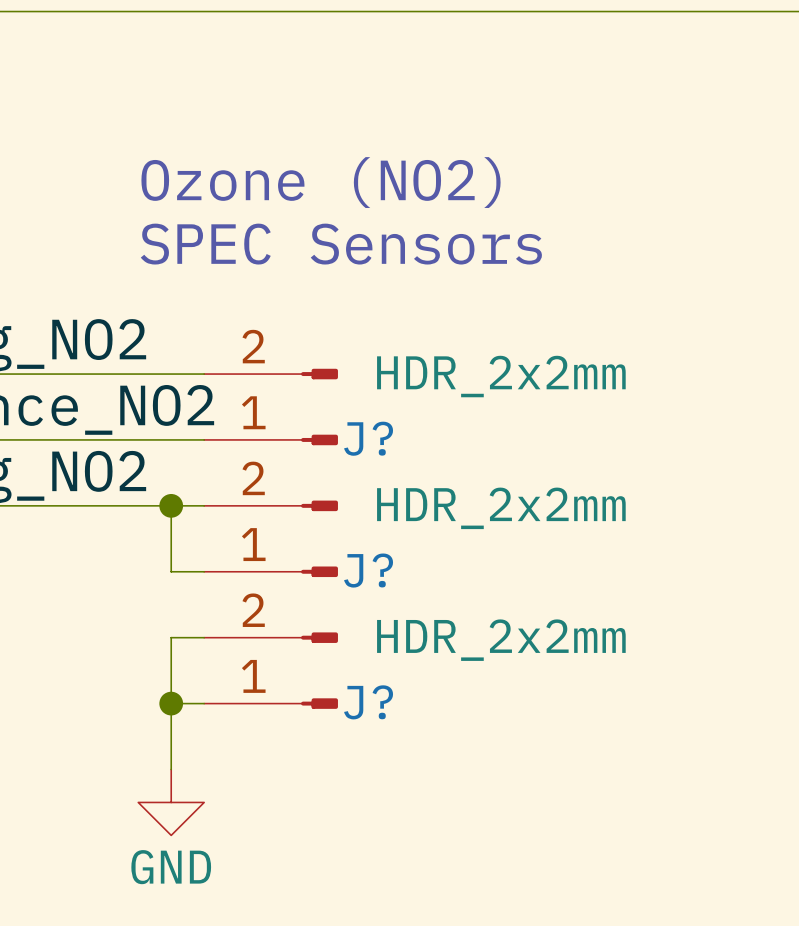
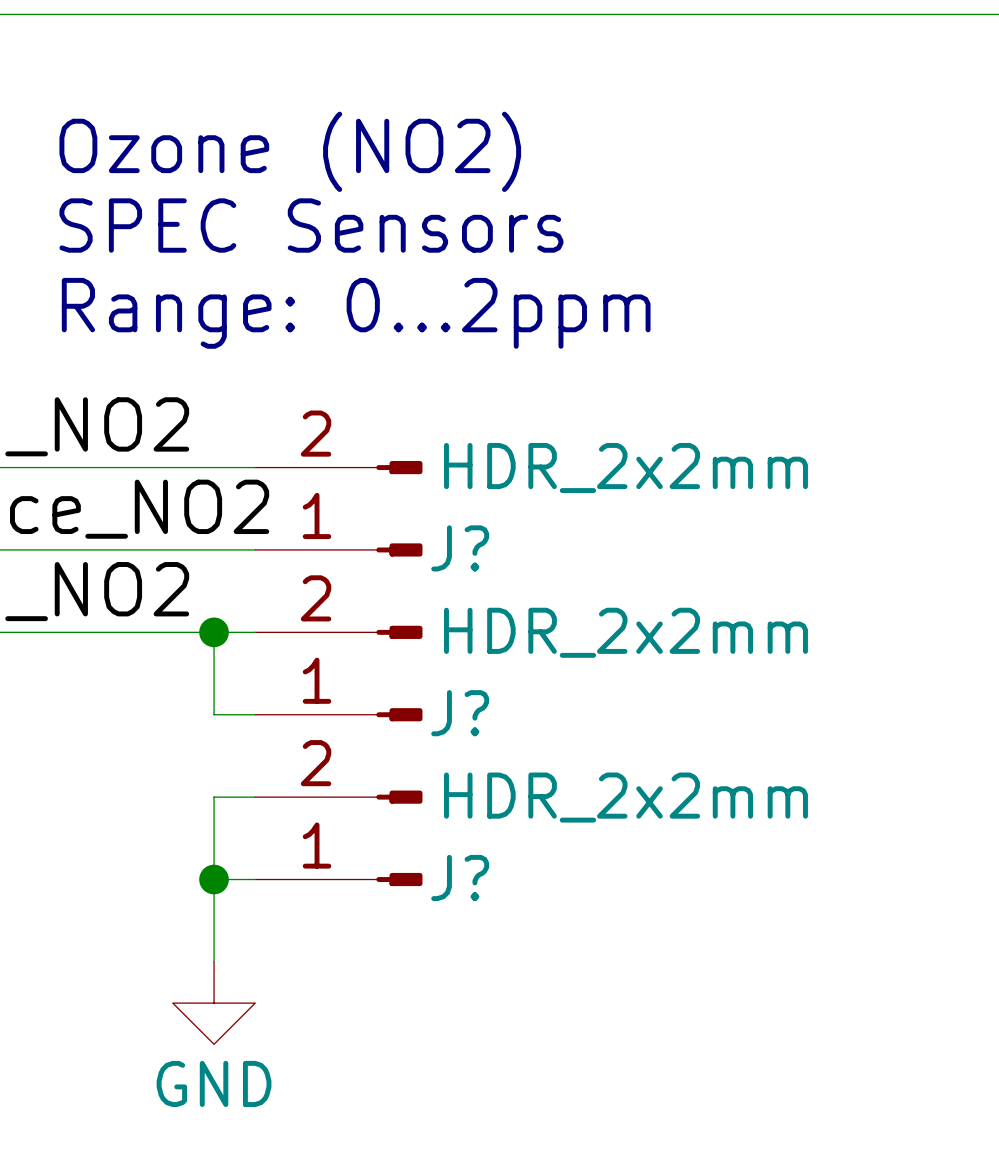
text position: Ozone (NO2) (321, 182) -> Ozone (NO2) (290, 151)
text position: SPEC Sensors (341, 244) -> SPEC Sensors (311, 225)
text: none -> Range: 0...2ppm (356, 313)

